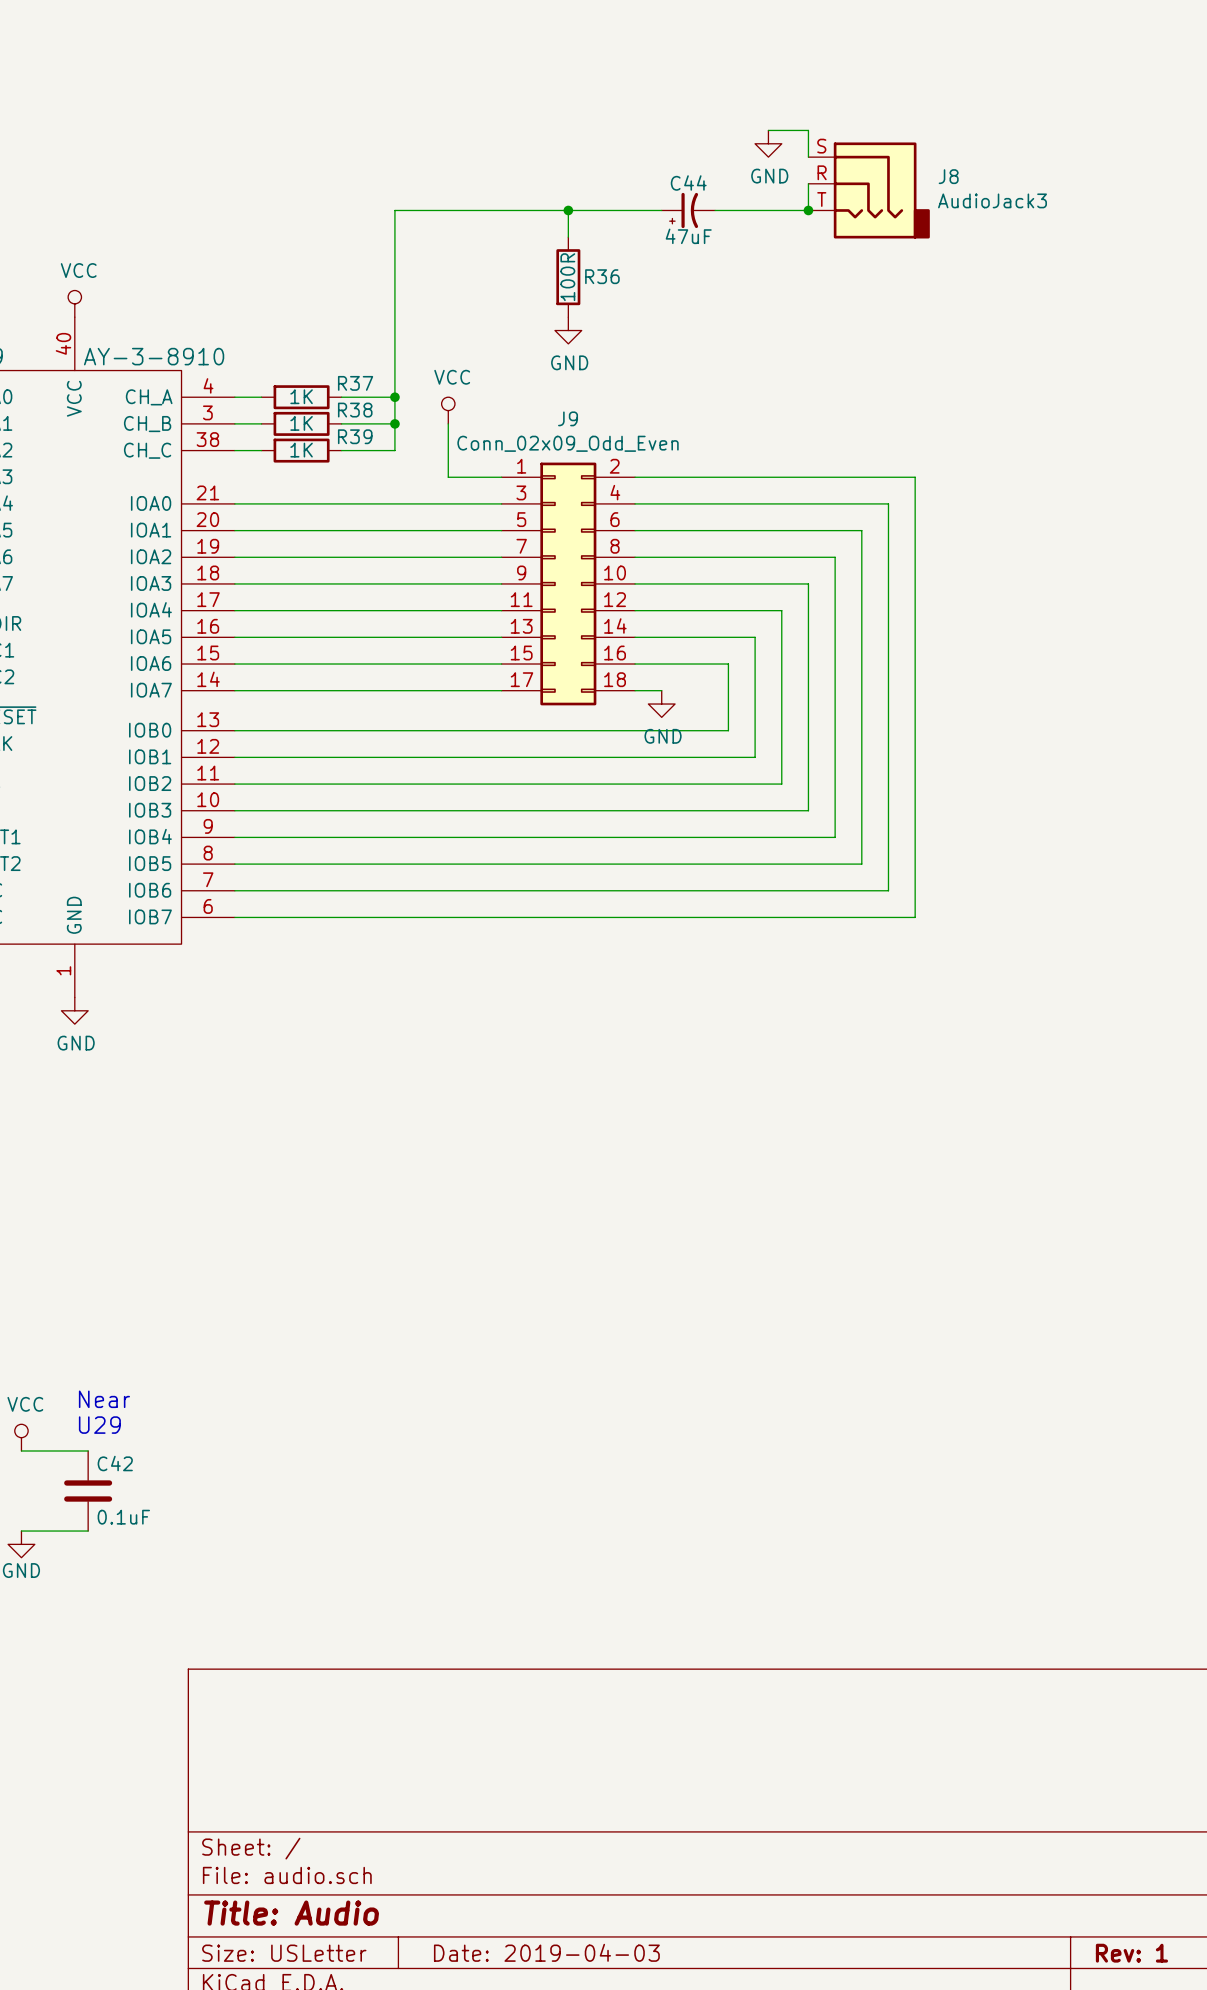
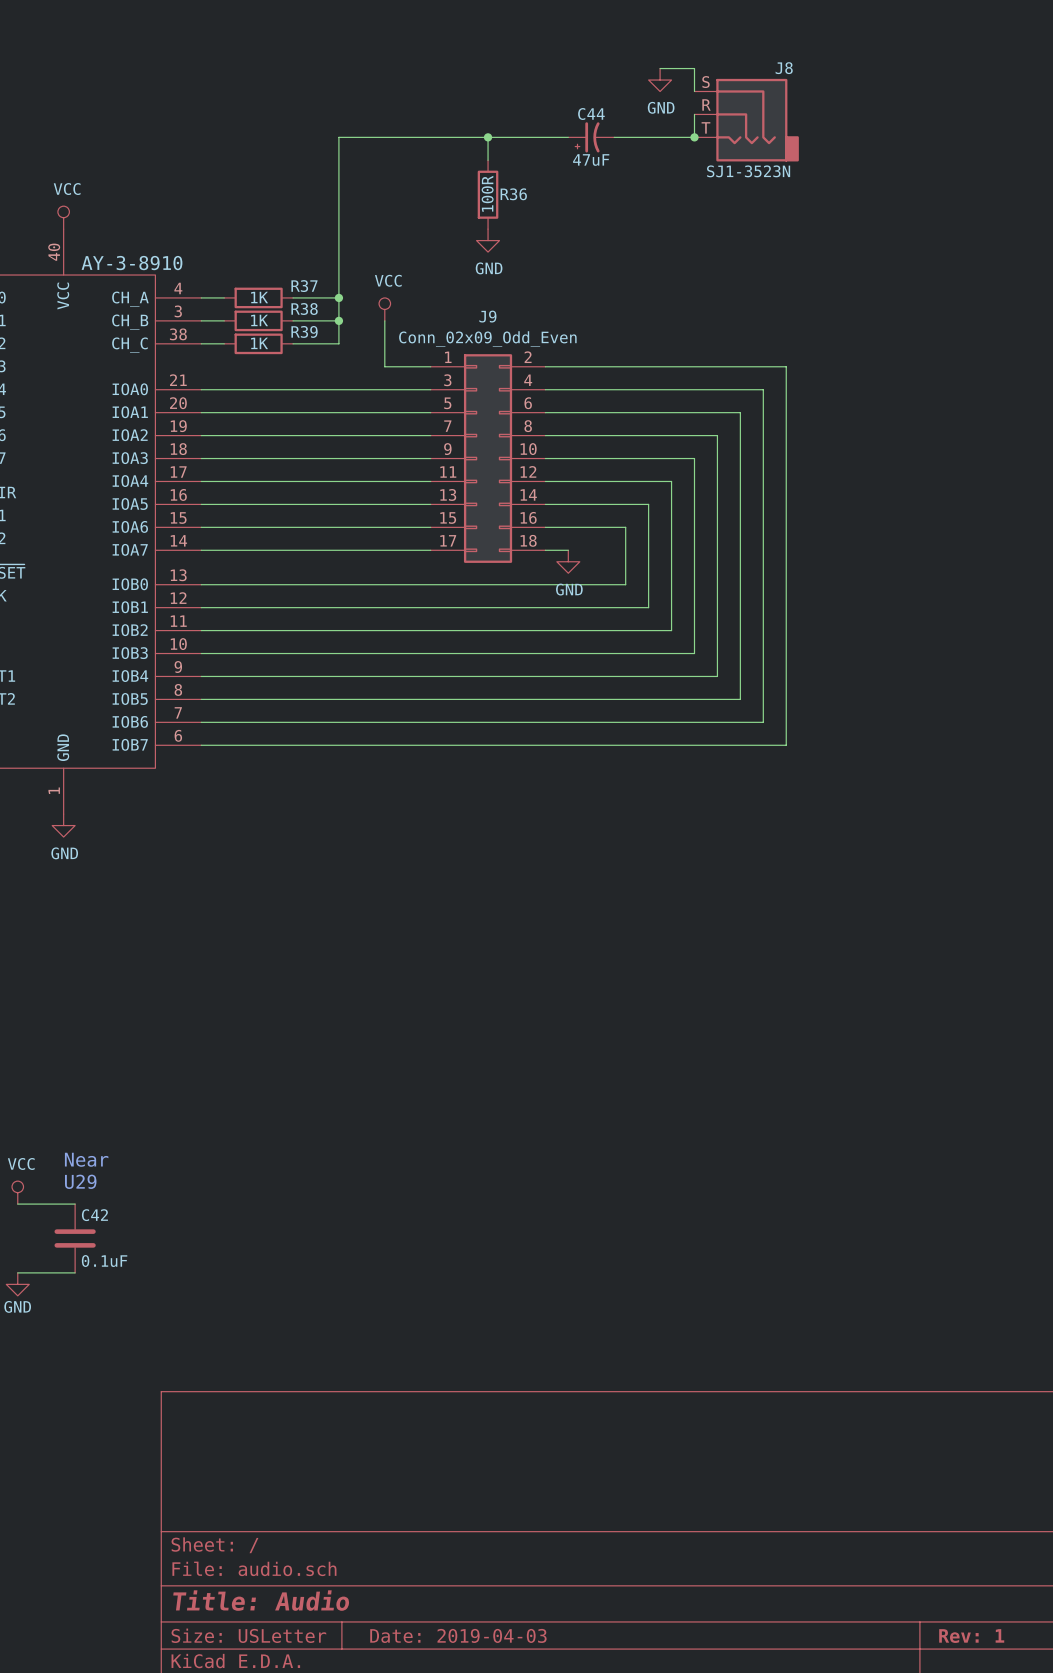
J8 name position: J8 (948, 176) -> J8 (784, 68)
J8 value: AudioJack3 (992, 200) -> SJ1-3523N (748, 171)

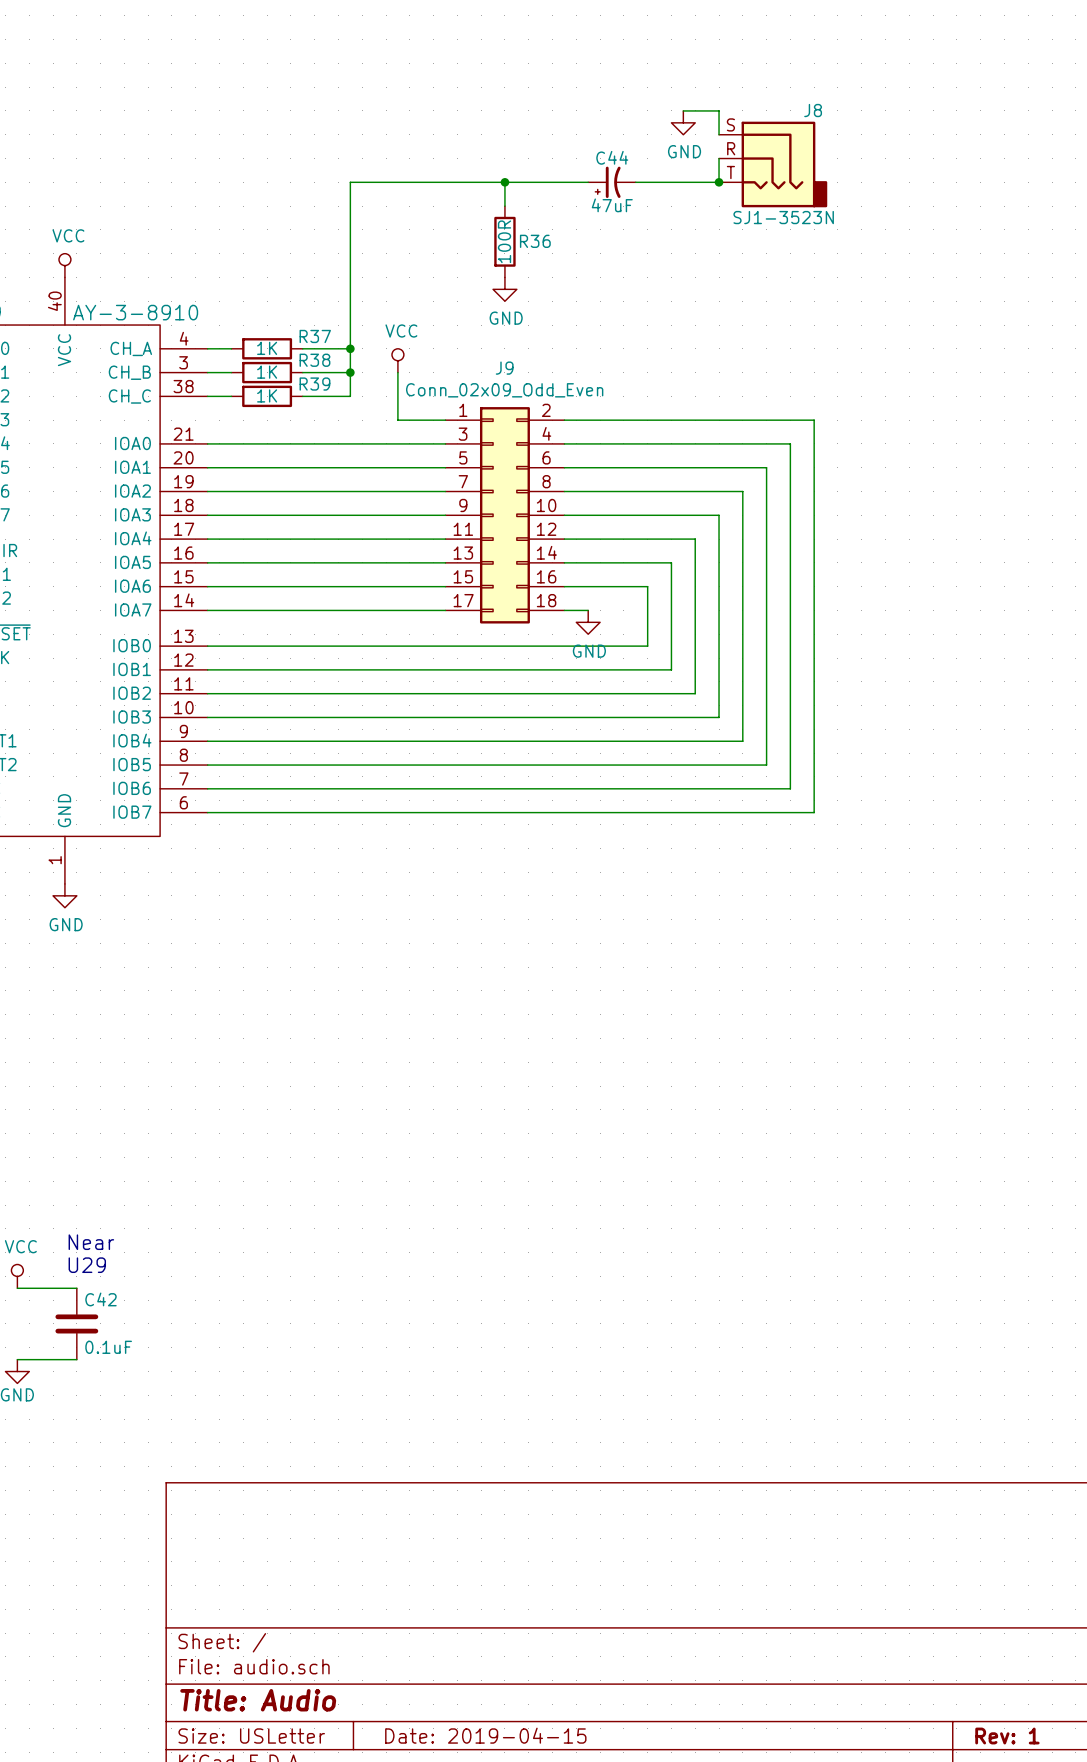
title block: Date: 2019-04-03 (458, 1635) -> Date: 2019-04-15 (485, 1735)

